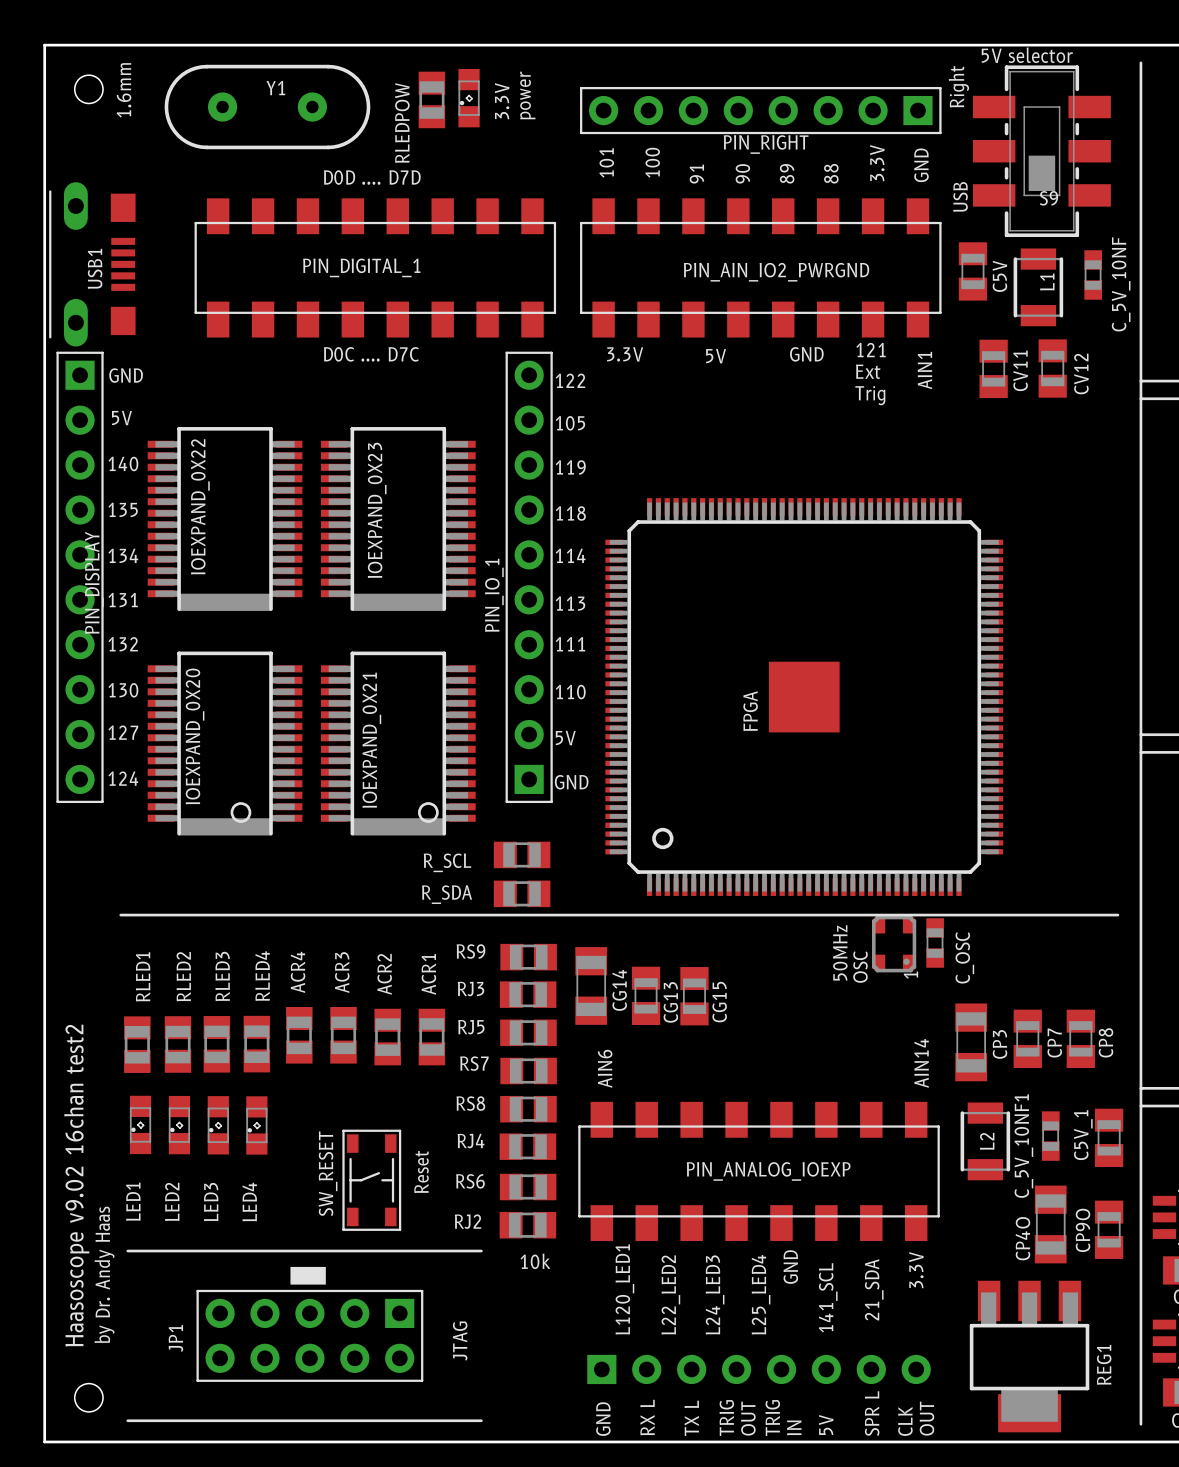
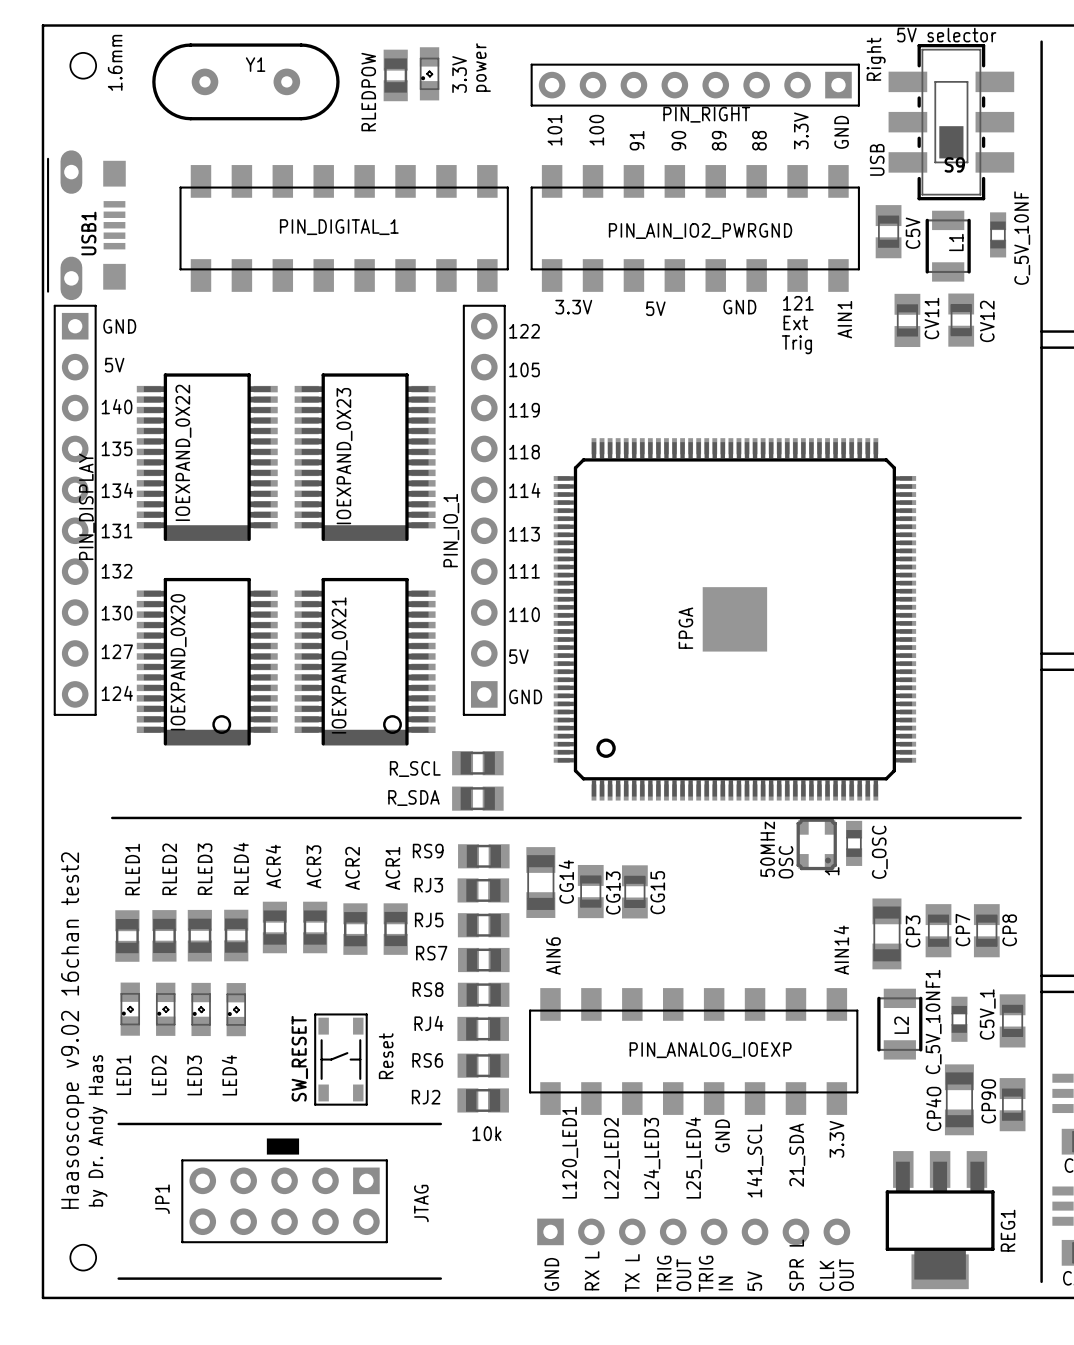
text: D0D .... D7D (372, 177) -> none
text: D0C .... D7C (371, 354) -> none

